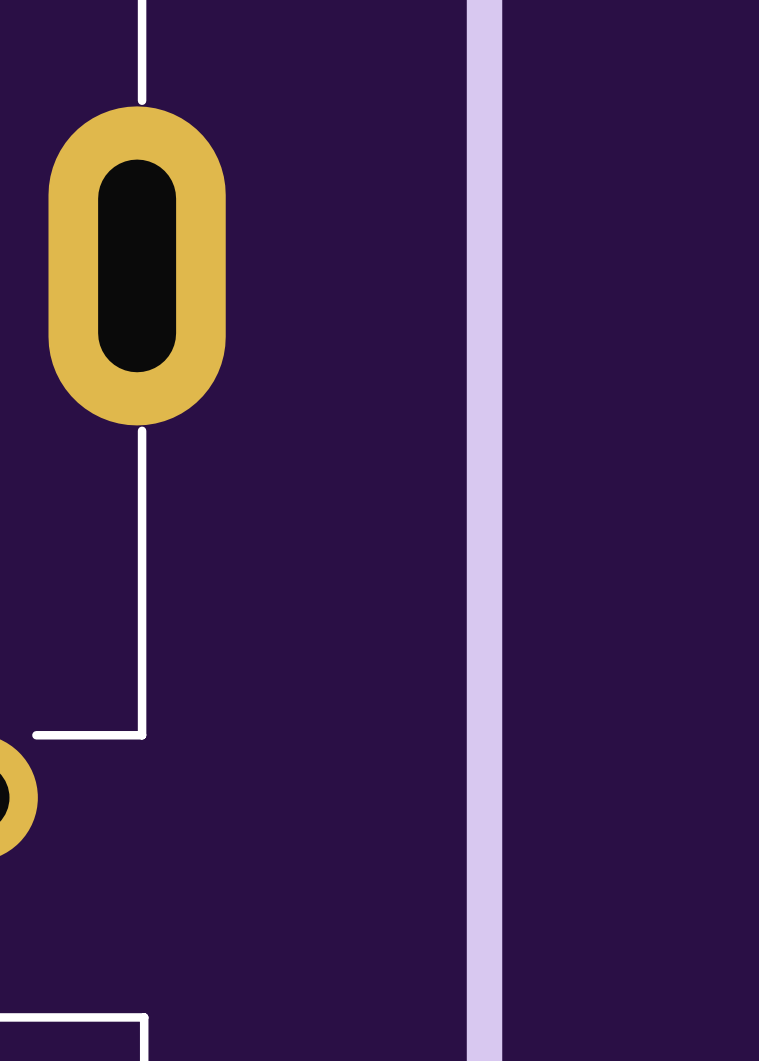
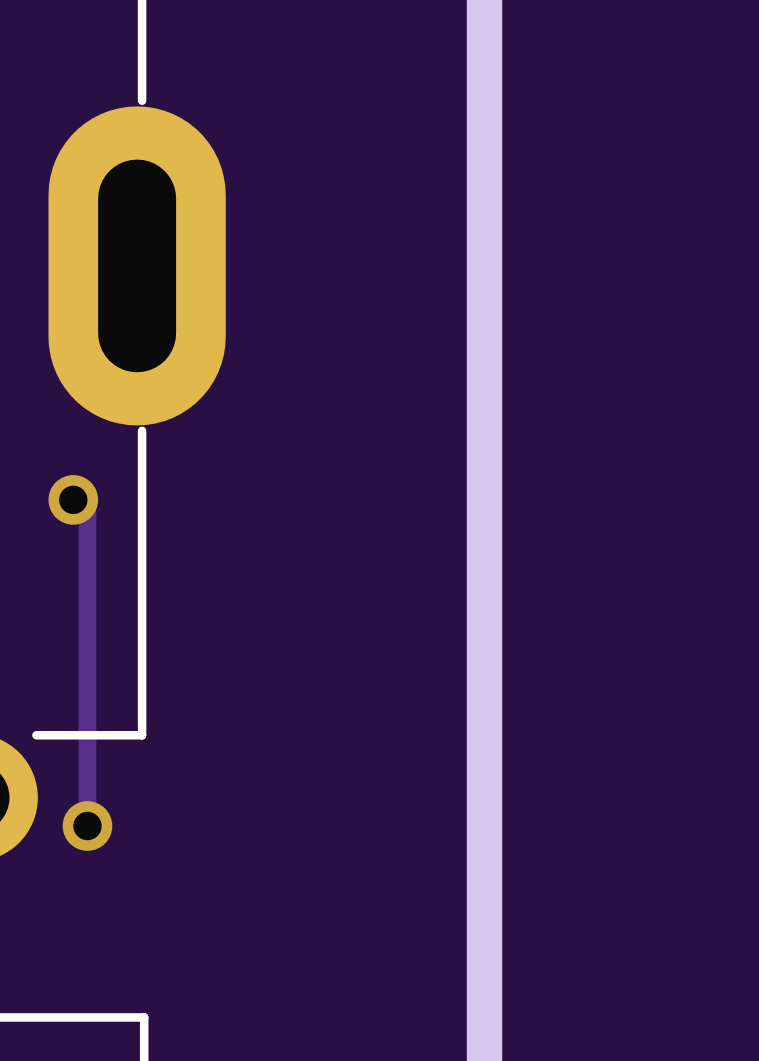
track: none -> (73, 499) (87, 514) (87, 826)
via: none -> (73, 499)
via: none -> (87, 826)

